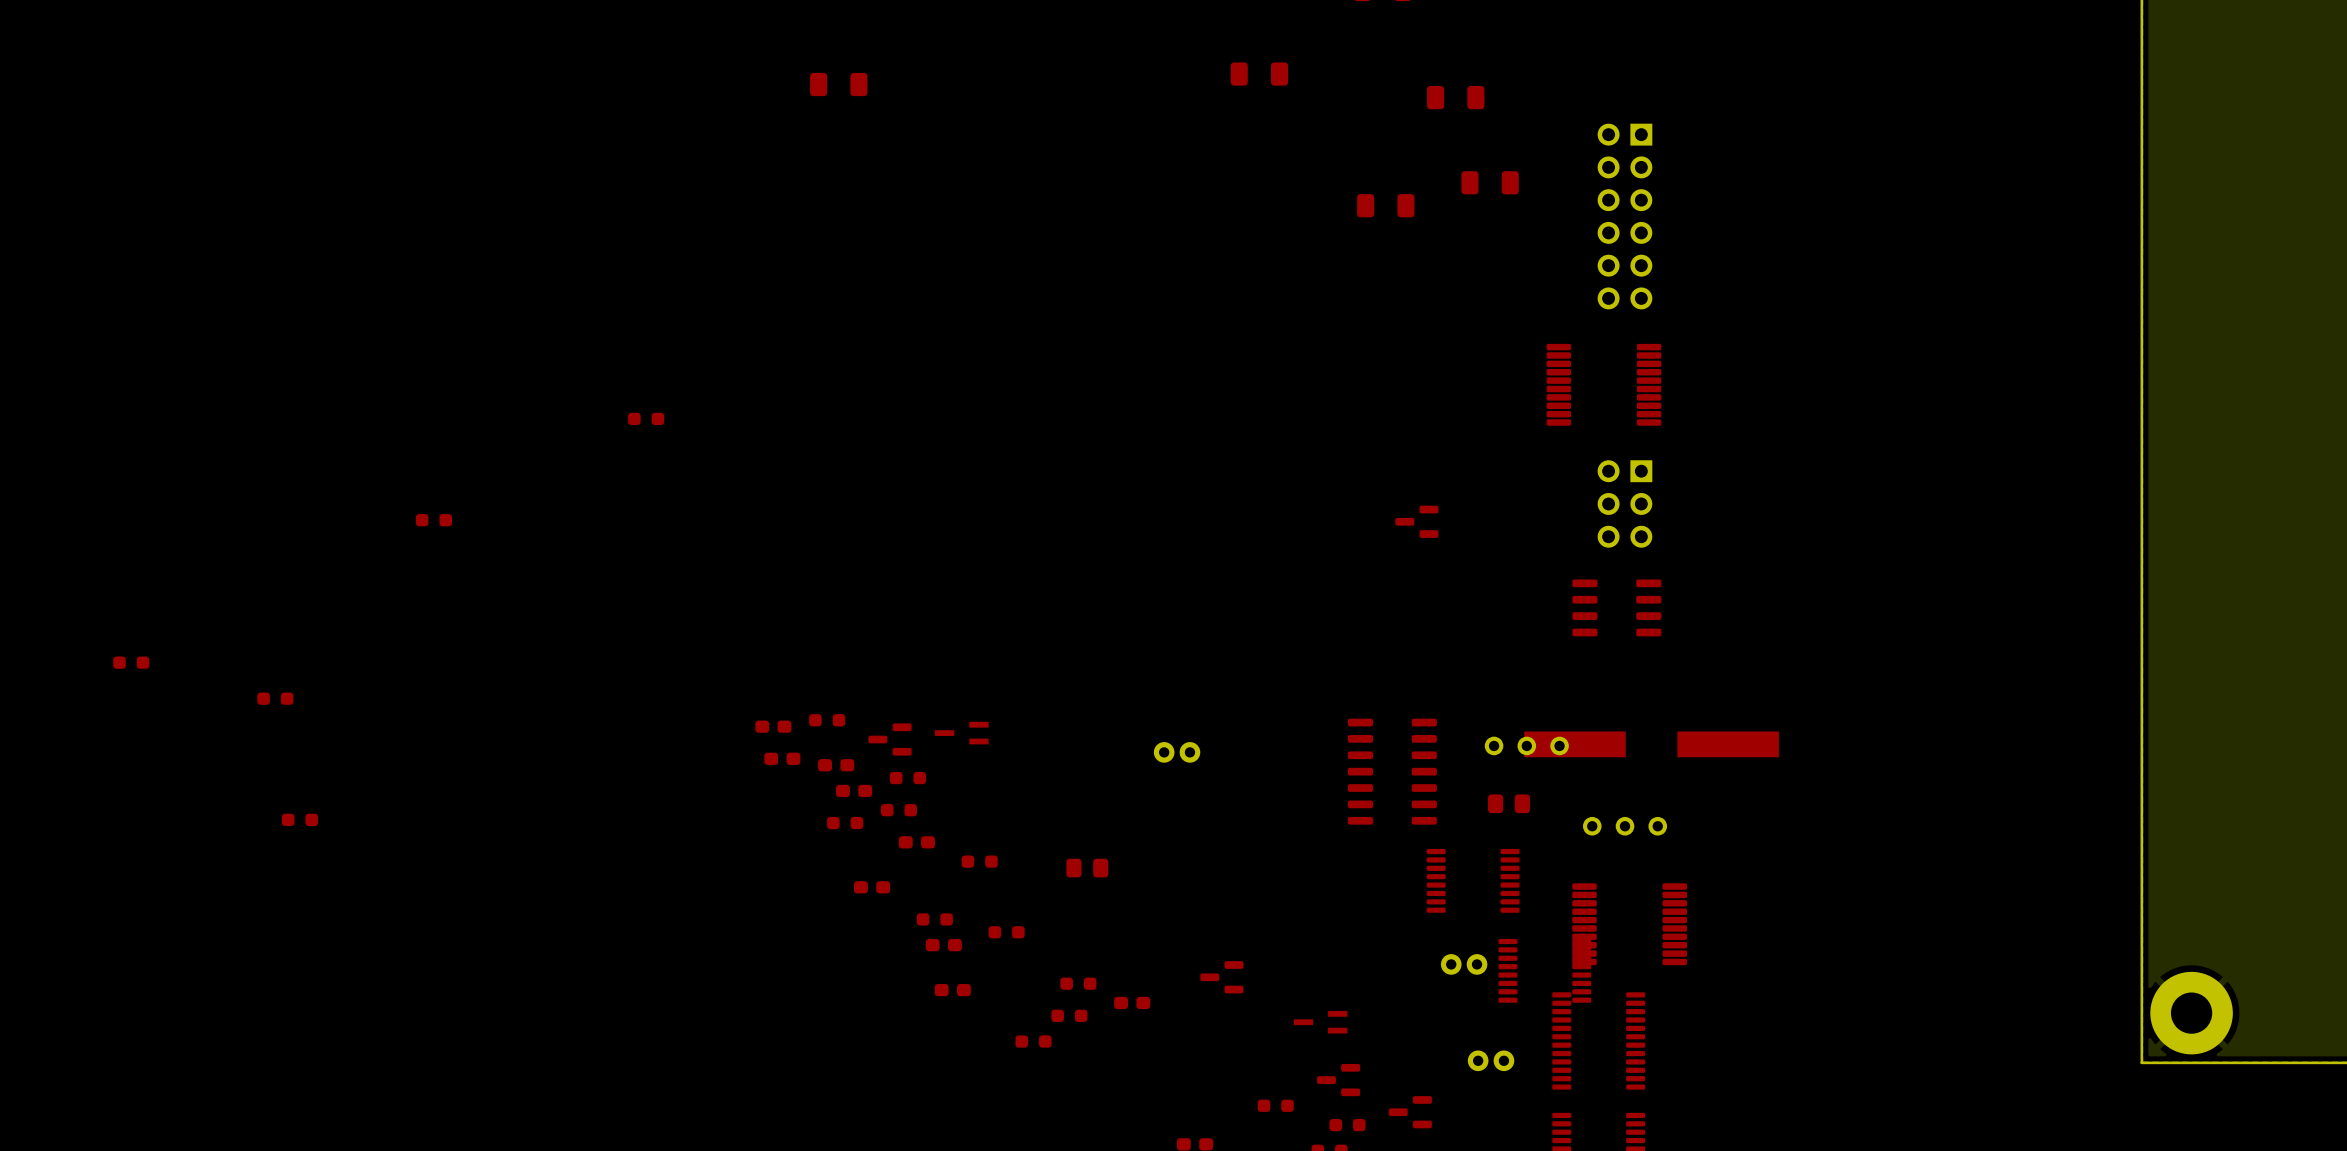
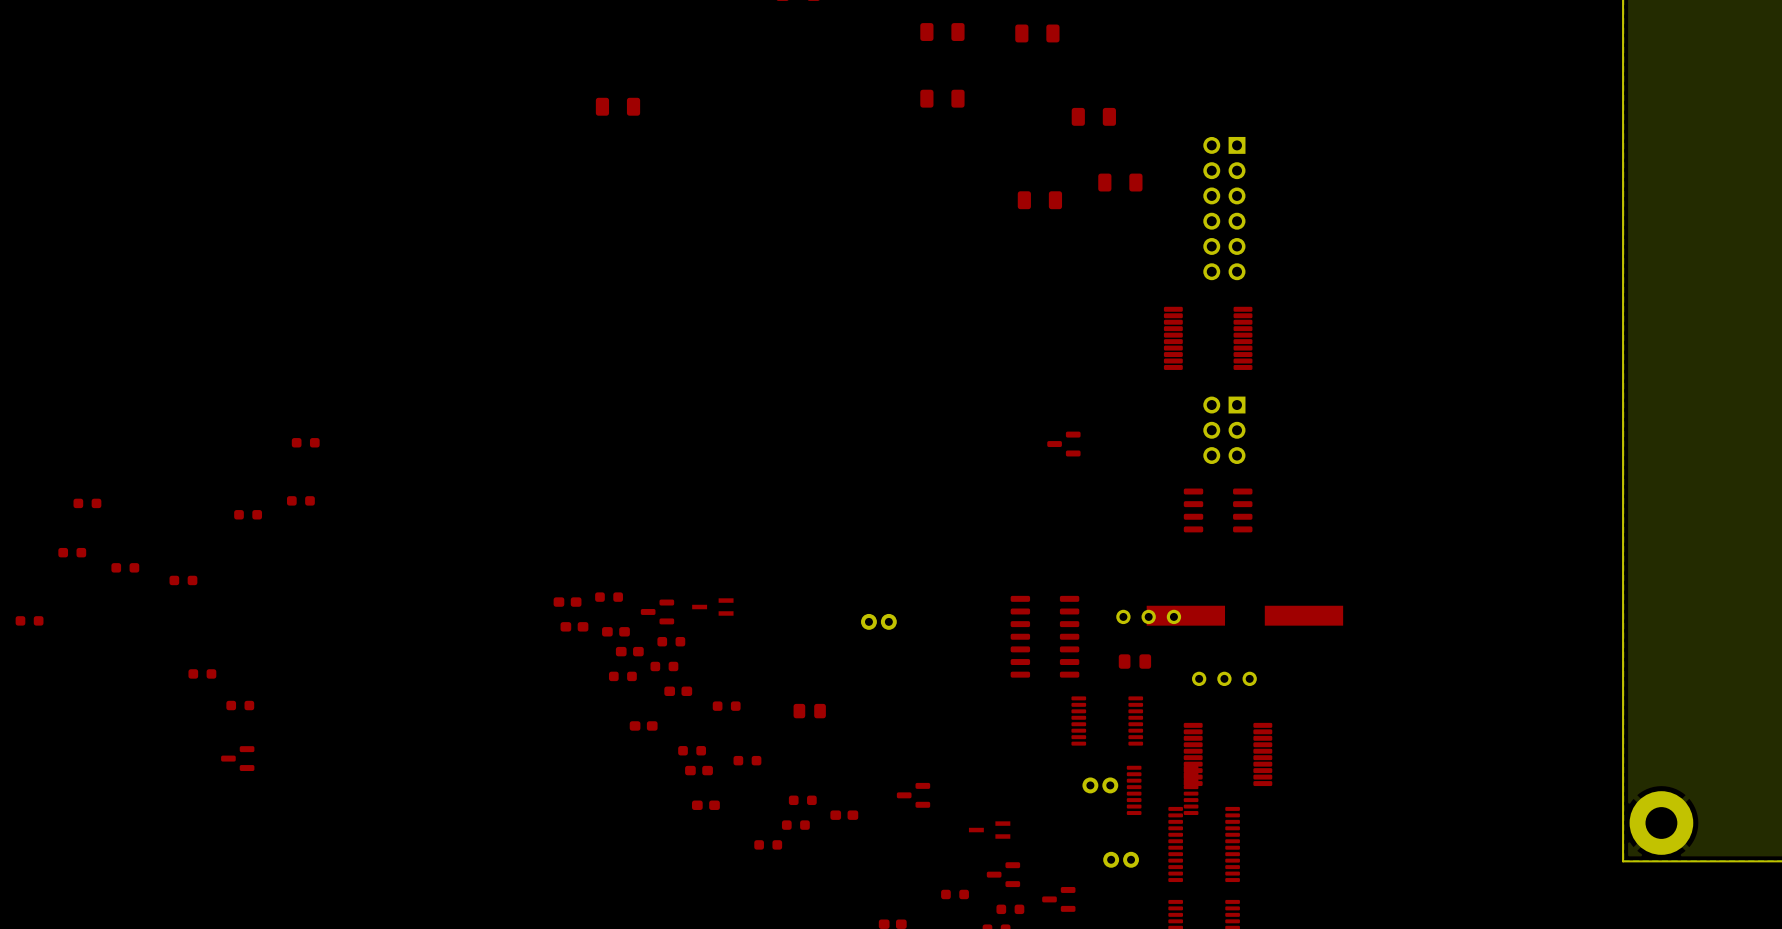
part: (646, 418) -> none
part: none -> (300, 500)
part: none -> (87, 503)
part: none -> (248, 514)
part: none -> (125, 567)
part: none -> (29, 620)
part: none -> (240, 705)
part: none -> (237, 758)

